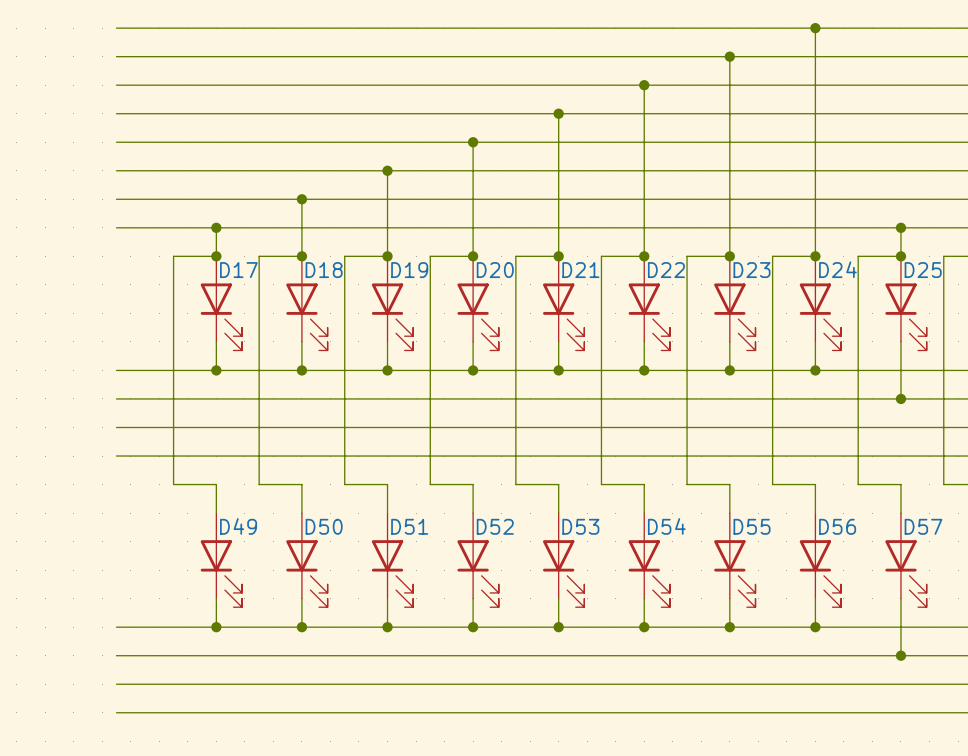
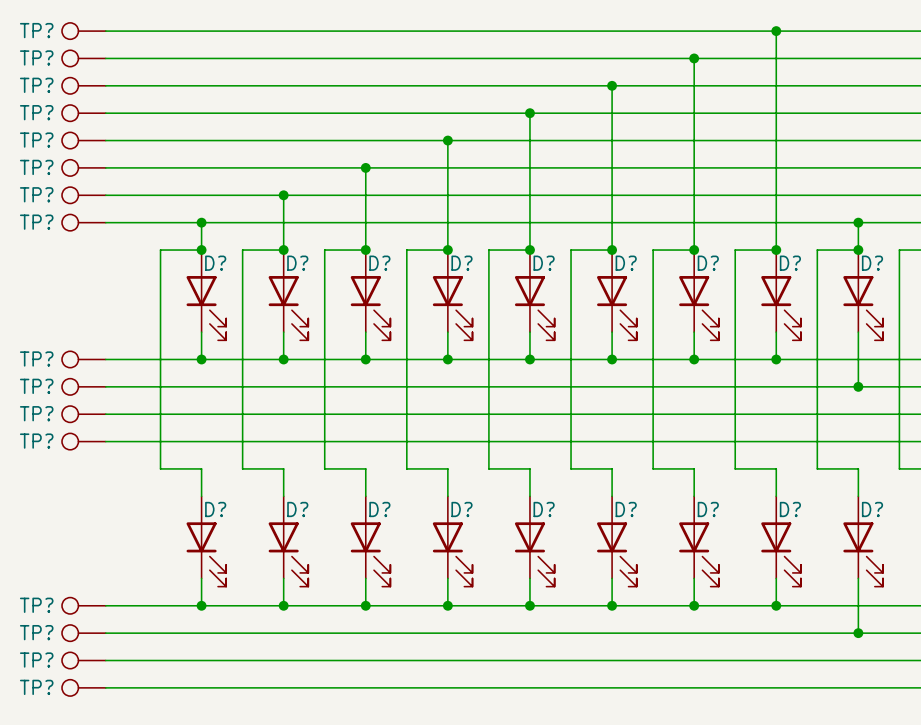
TP?: none -> (83, 31)
TP?: none -> (83, 58)
TP?: none -> (83, 85)
TP?: none -> (83, 113)
TP?: none -> (83, 140)
TP?: none -> (83, 167)
TP?: none -> (83, 195)
TP?: none -> (83, 222)
D24 name: D24 (837, 269) -> D? (790, 263)
D17 name: D17 (238, 270) -> D? (215, 263)
D18 name: D18 (324, 270) -> D? (297, 263)
D19 name: D19 (409, 270) -> D? (379, 263)
D20 name: D20 (495, 270) -> D? (461, 263)
D21 name: D21 (580, 270) -> D? (544, 263)
D22 name: D22 (666, 270) -> D? (626, 263)
D23 name: D23 (752, 270) -> D? (708, 263)
D25 name: D25 (923, 270) -> D? (872, 263)
TP?: none -> (83, 359)
TP?: none -> (83, 386)
TP?: none -> (83, 414)
TP?: none -> (83, 441)
D49 name: D49 (238, 526) -> D? (215, 509)
D50 name: D50 (324, 526) -> D? (297, 509)
D51 name: D51 (409, 526) -> D? (379, 509)
D52 name: D52 (495, 526) -> D? (461, 509)
D53 name: D53 (580, 526) -> D? (544, 509)
D54 name: D54 (666, 526) -> D? (626, 509)
D55 name: D55 (752, 526) -> D? (708, 509)
D56 name: D56 (837, 526) -> D? (790, 509)
D57 name: D57 (923, 526) -> D? (872, 509)
TP?: none -> (83, 605)
TP?: none -> (83, 633)
TP?: none -> (83, 660)
TP?: none -> (83, 687)

